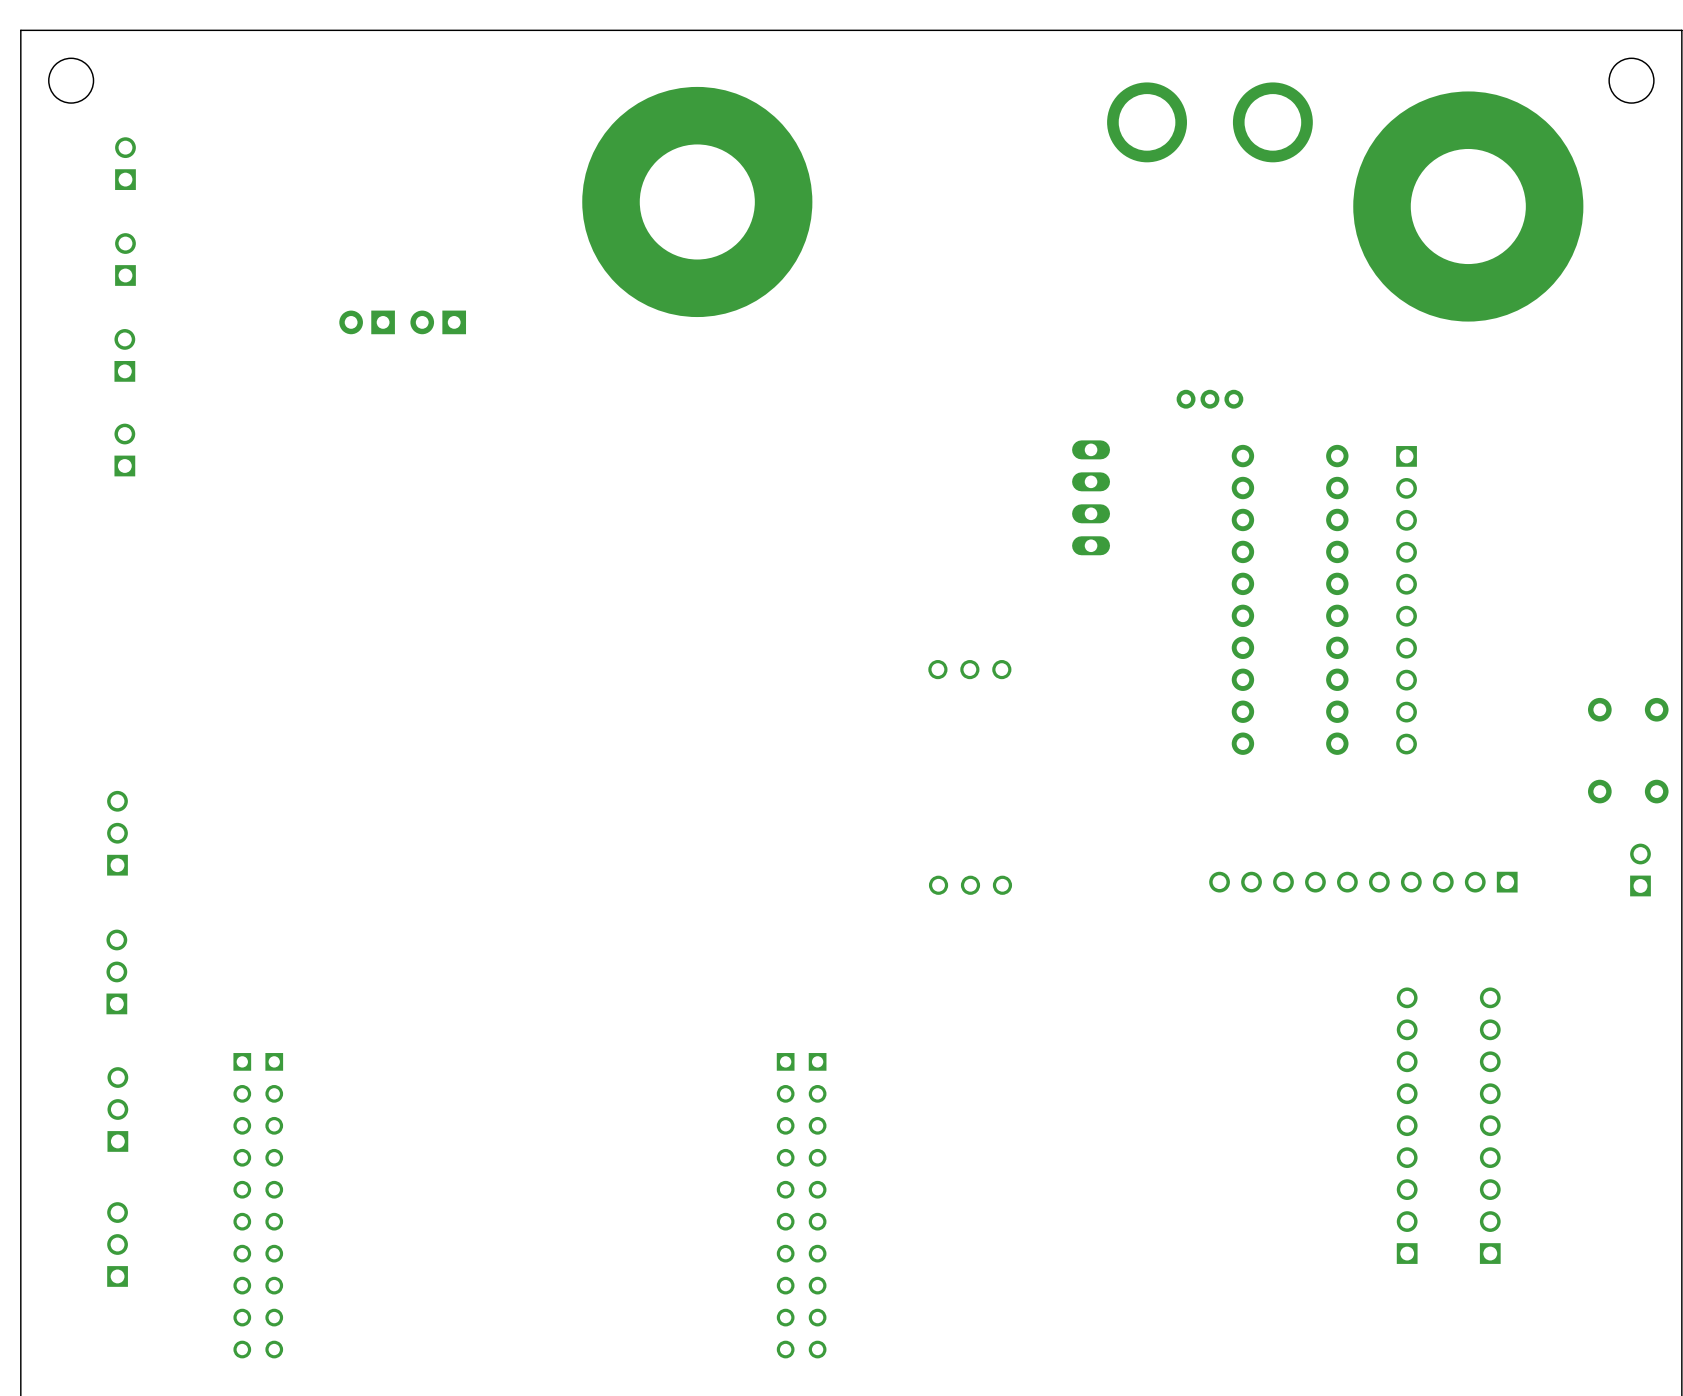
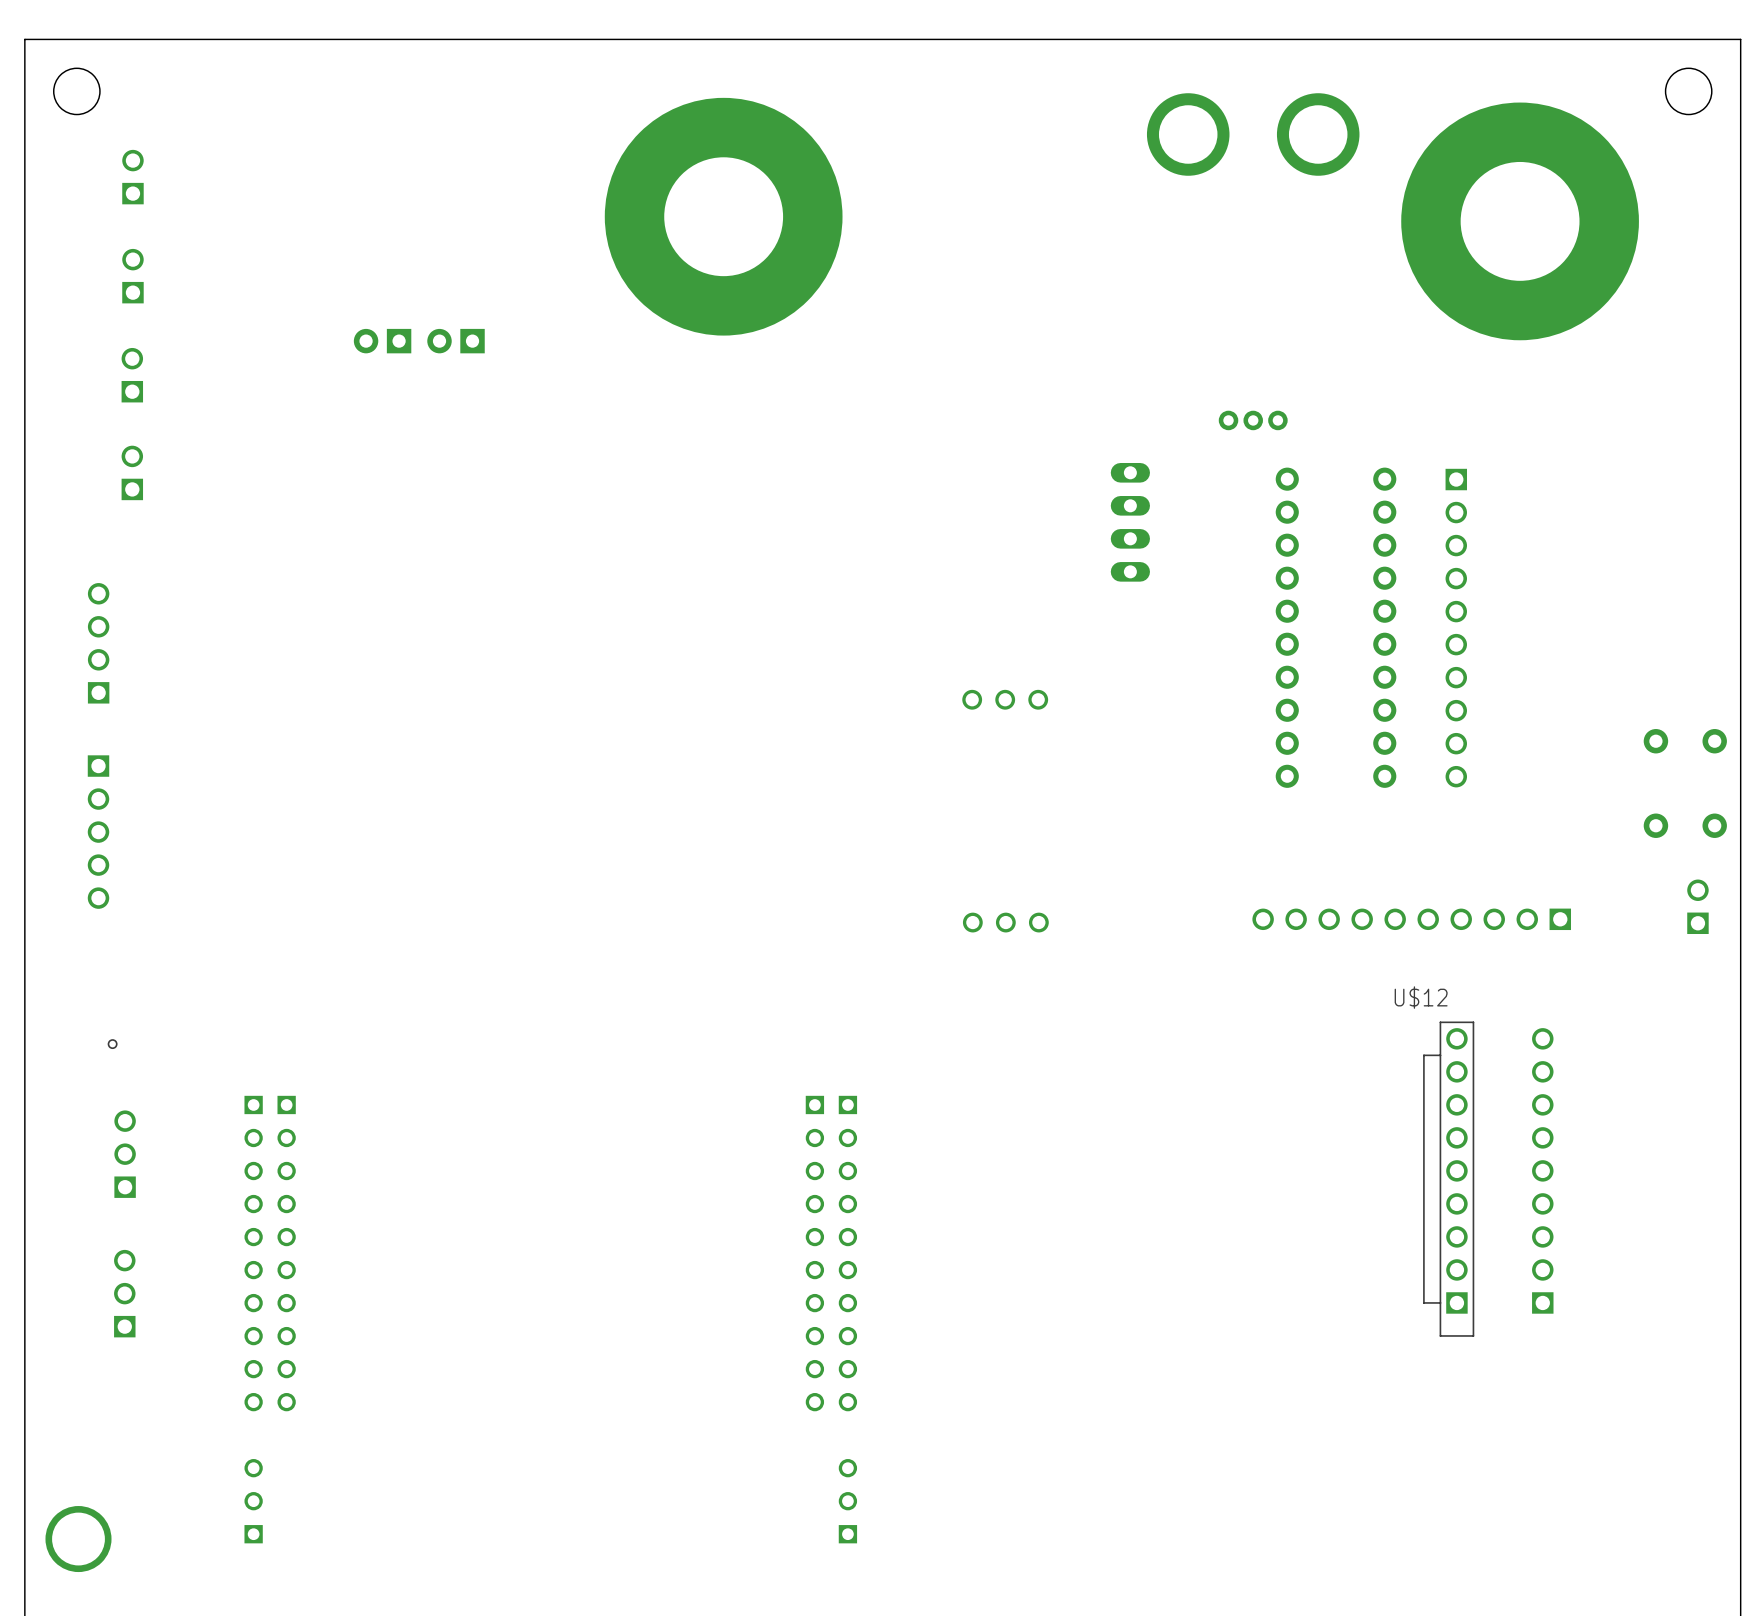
part: none -> (98, 643)
part: none -> (98, 832)
part: (117, 833) -> none
part: (116, 971) -> none
part: none -> (112, 1044)
U$12 side: top (1407, 1125) -> bottom (1448, 1179)

